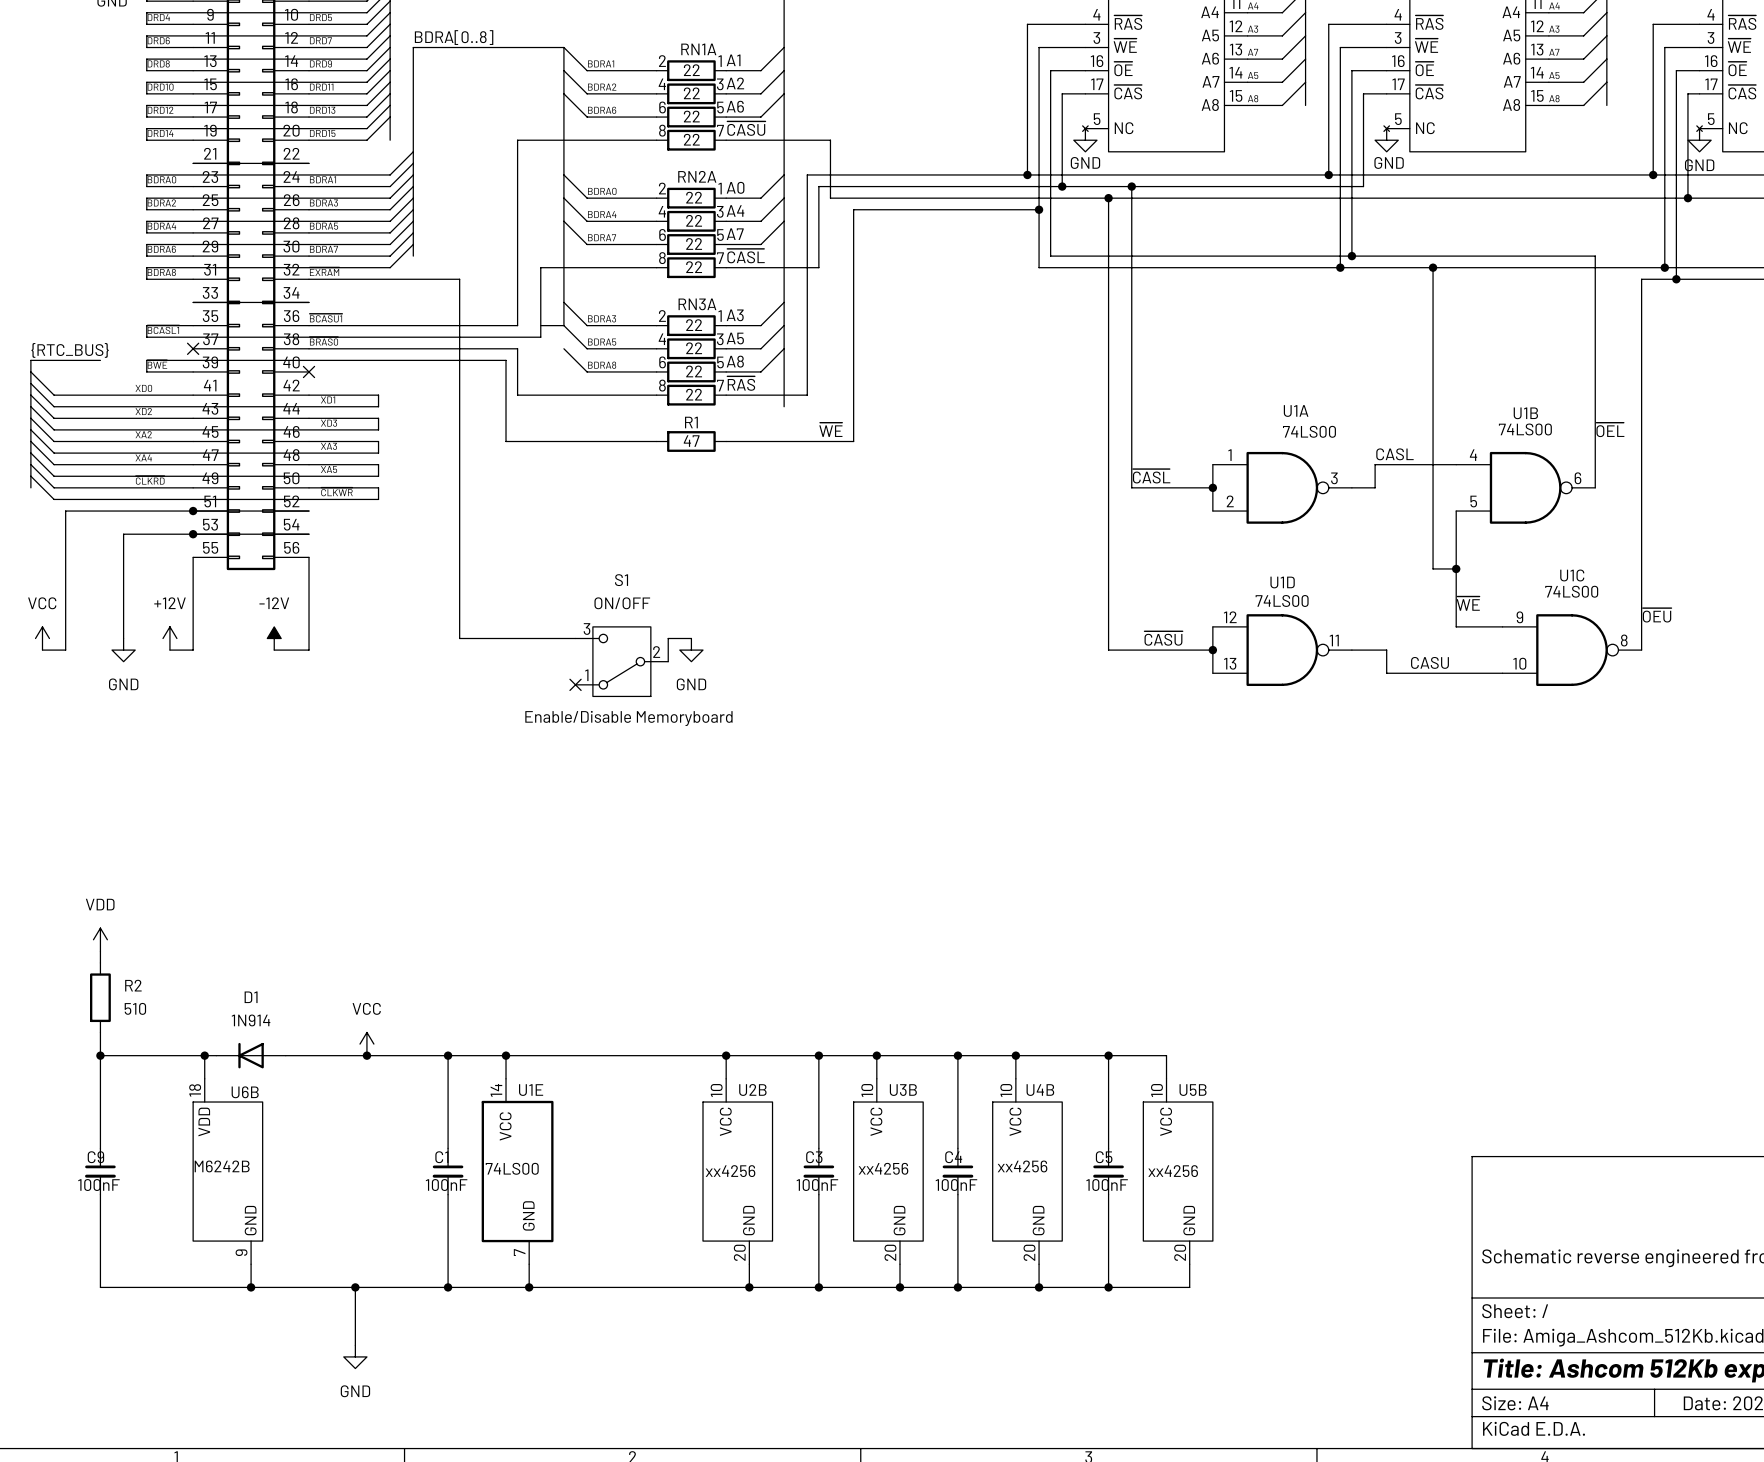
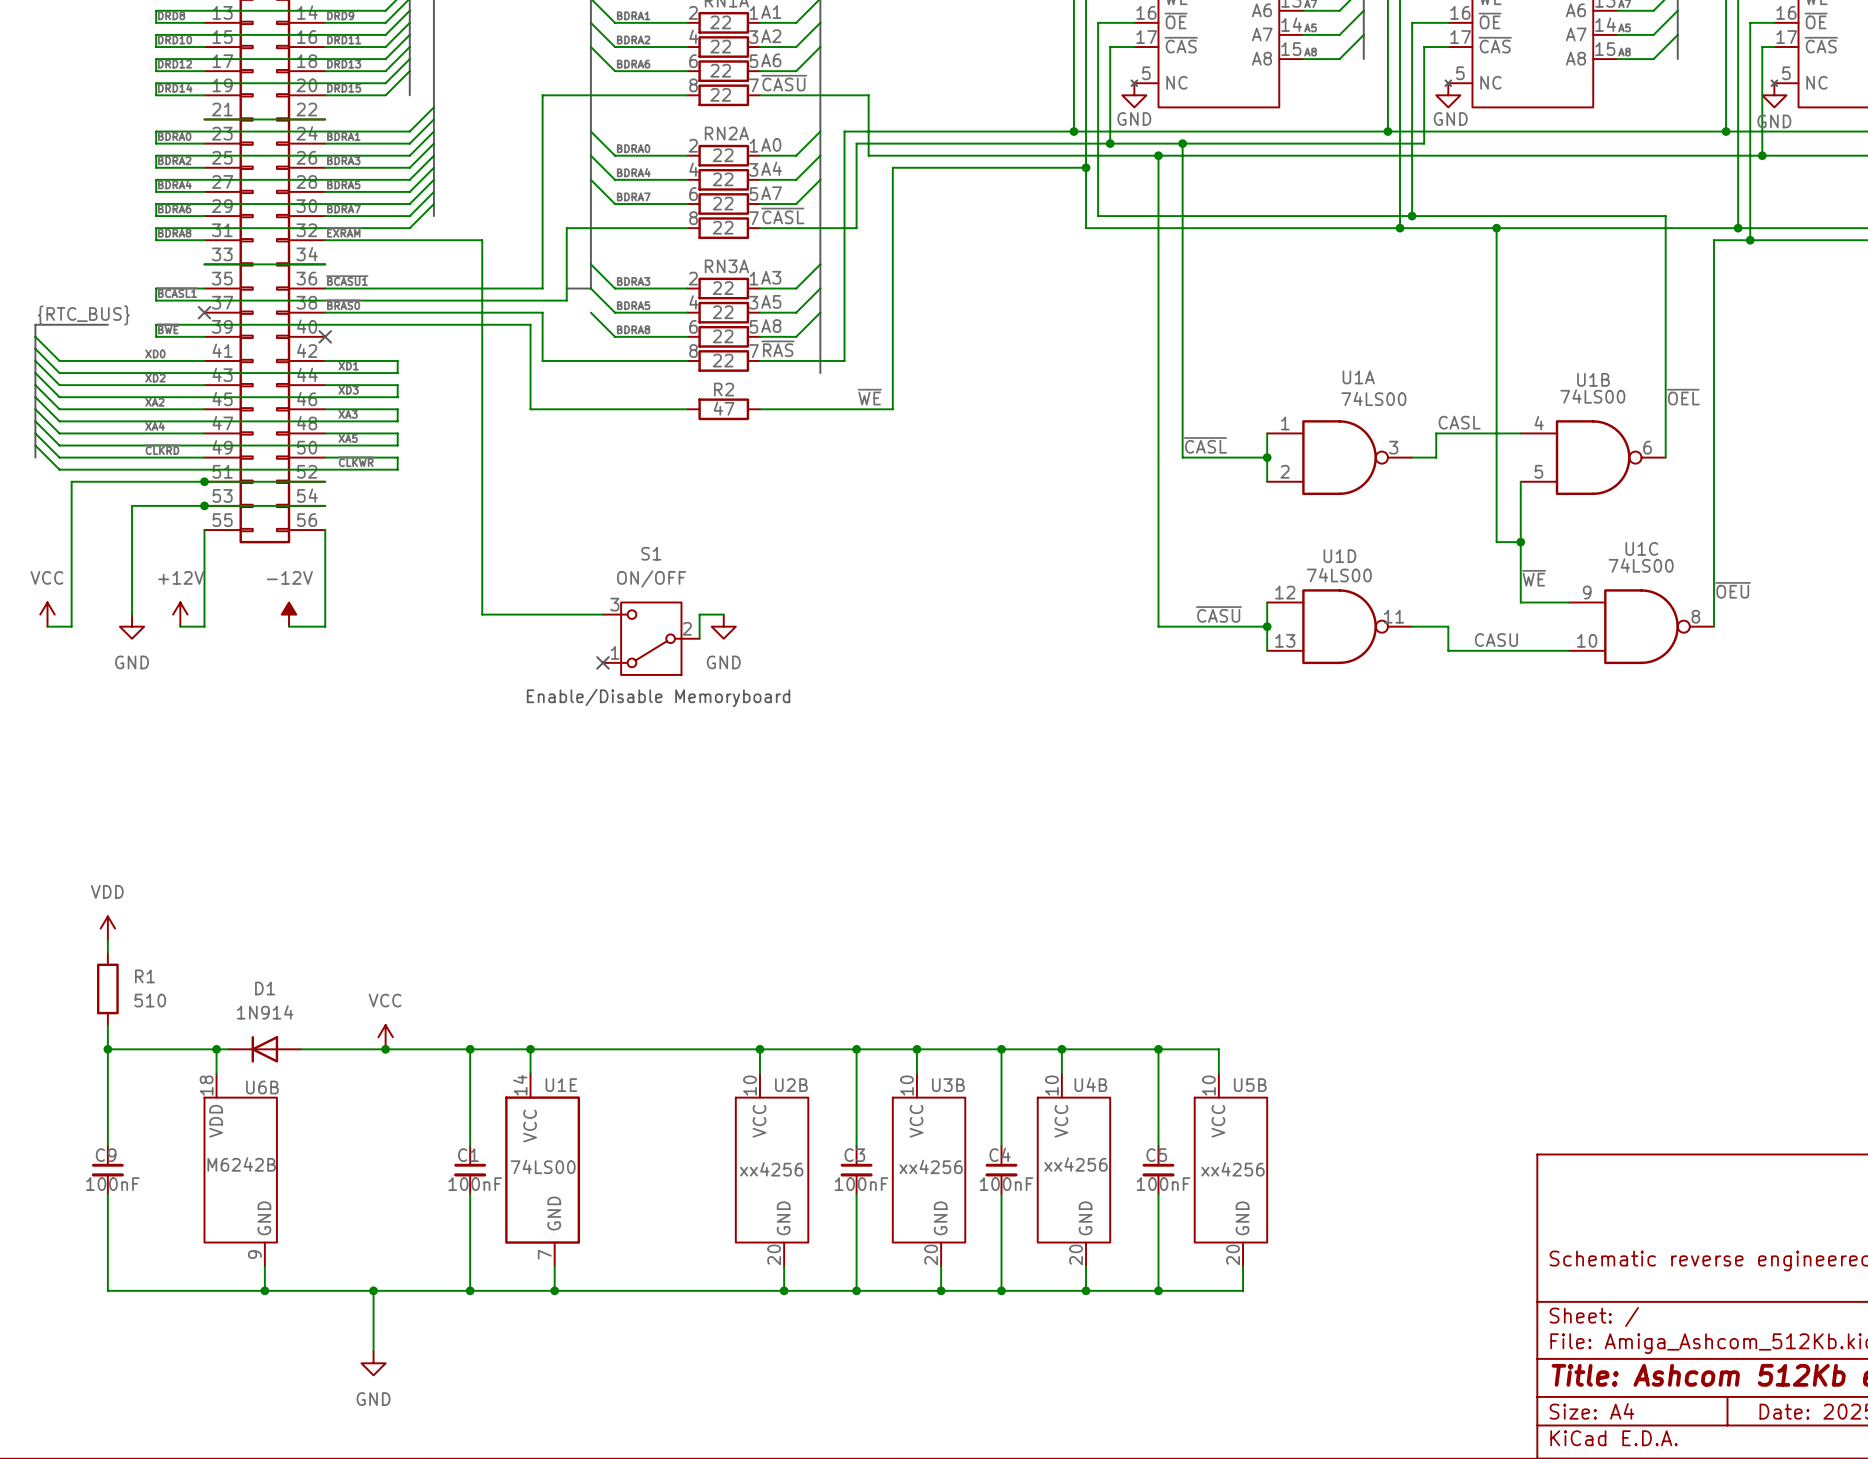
R1 name: R1 (691, 422) -> R2 (724, 389)
R2 name: R2 (133, 985) -> R1 (145, 976)

